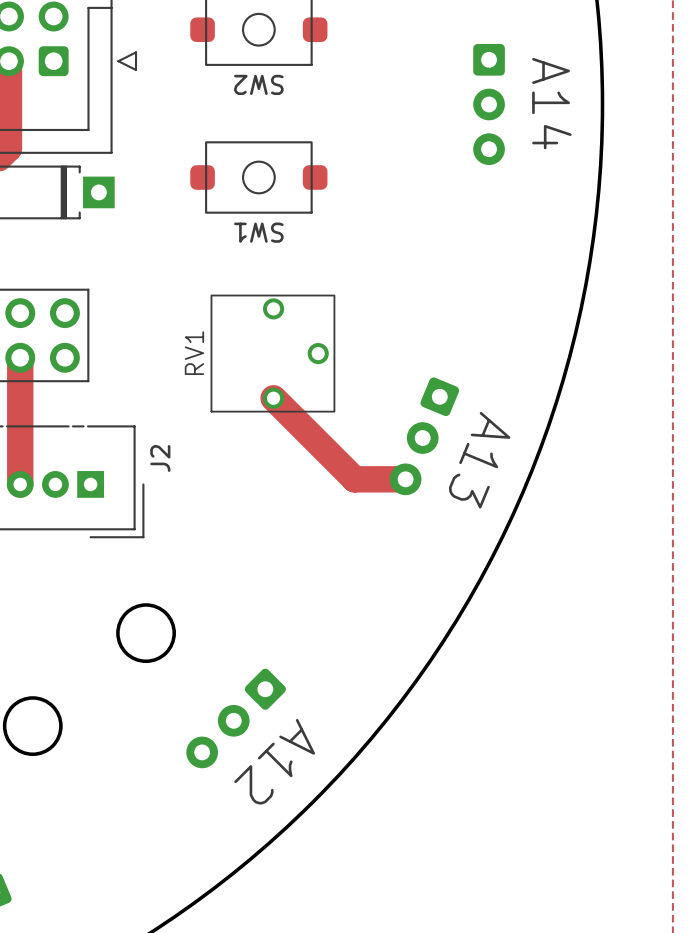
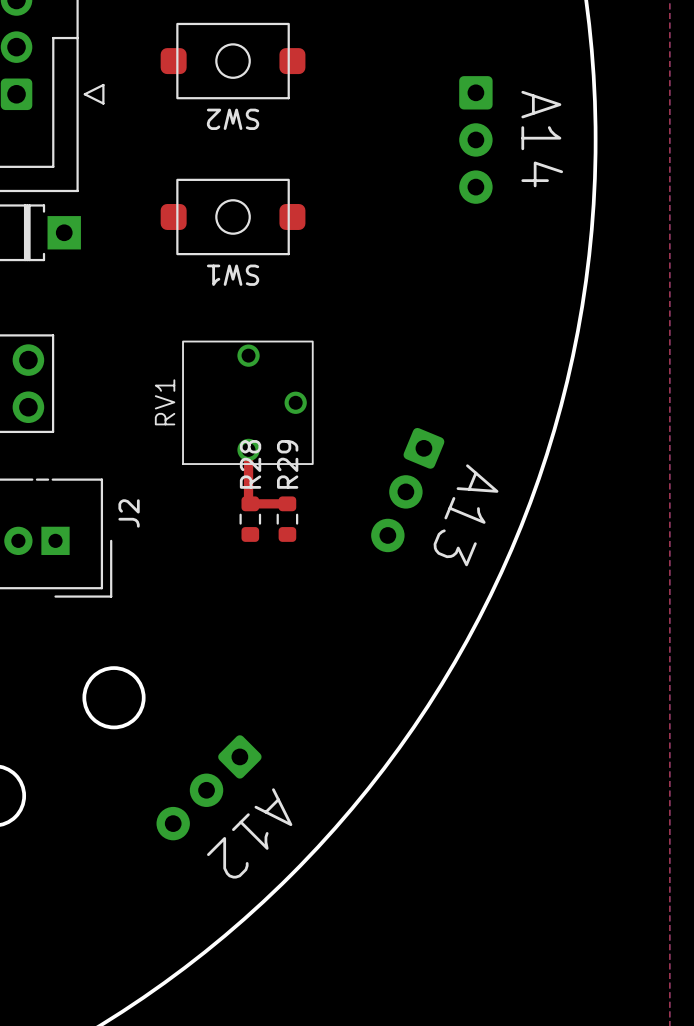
top track: (273, 398) (354, 479) (405, 479) -> (248, 449) (248, 505)
top track: none -> (250, 503) (287, 503)
R28: none -> (250, 519)
R29: none -> (287, 519)

